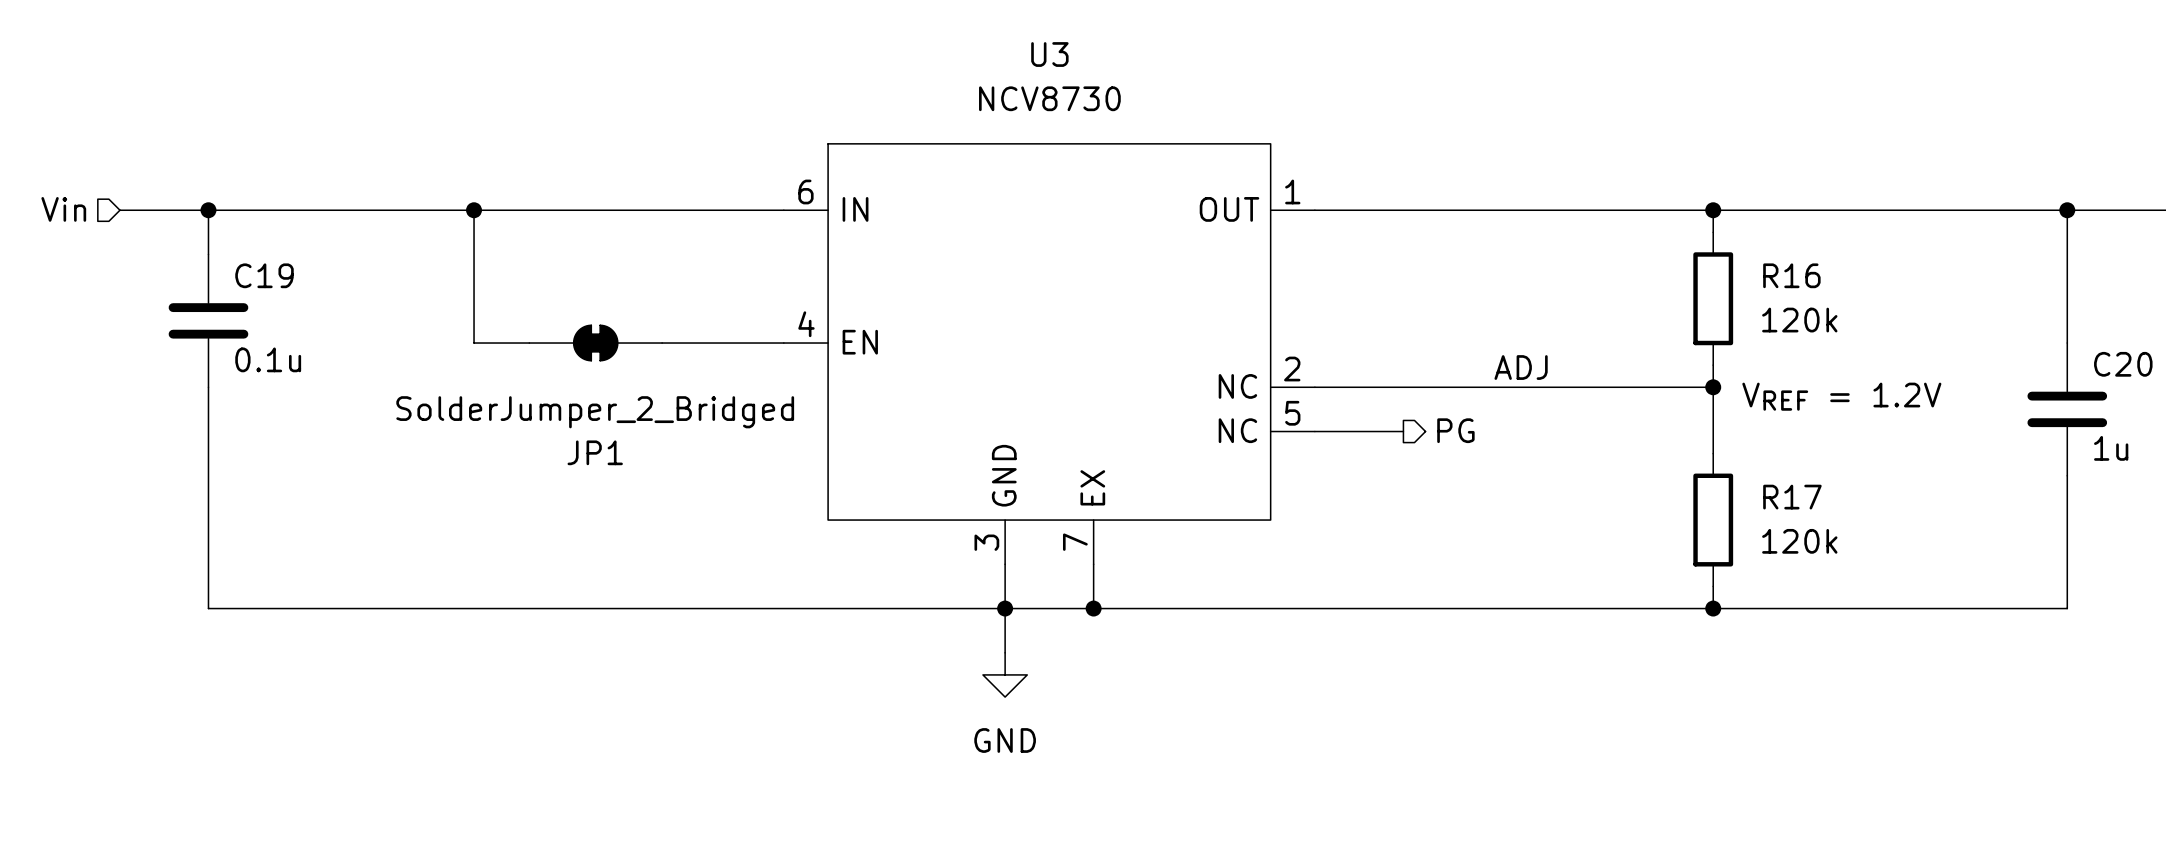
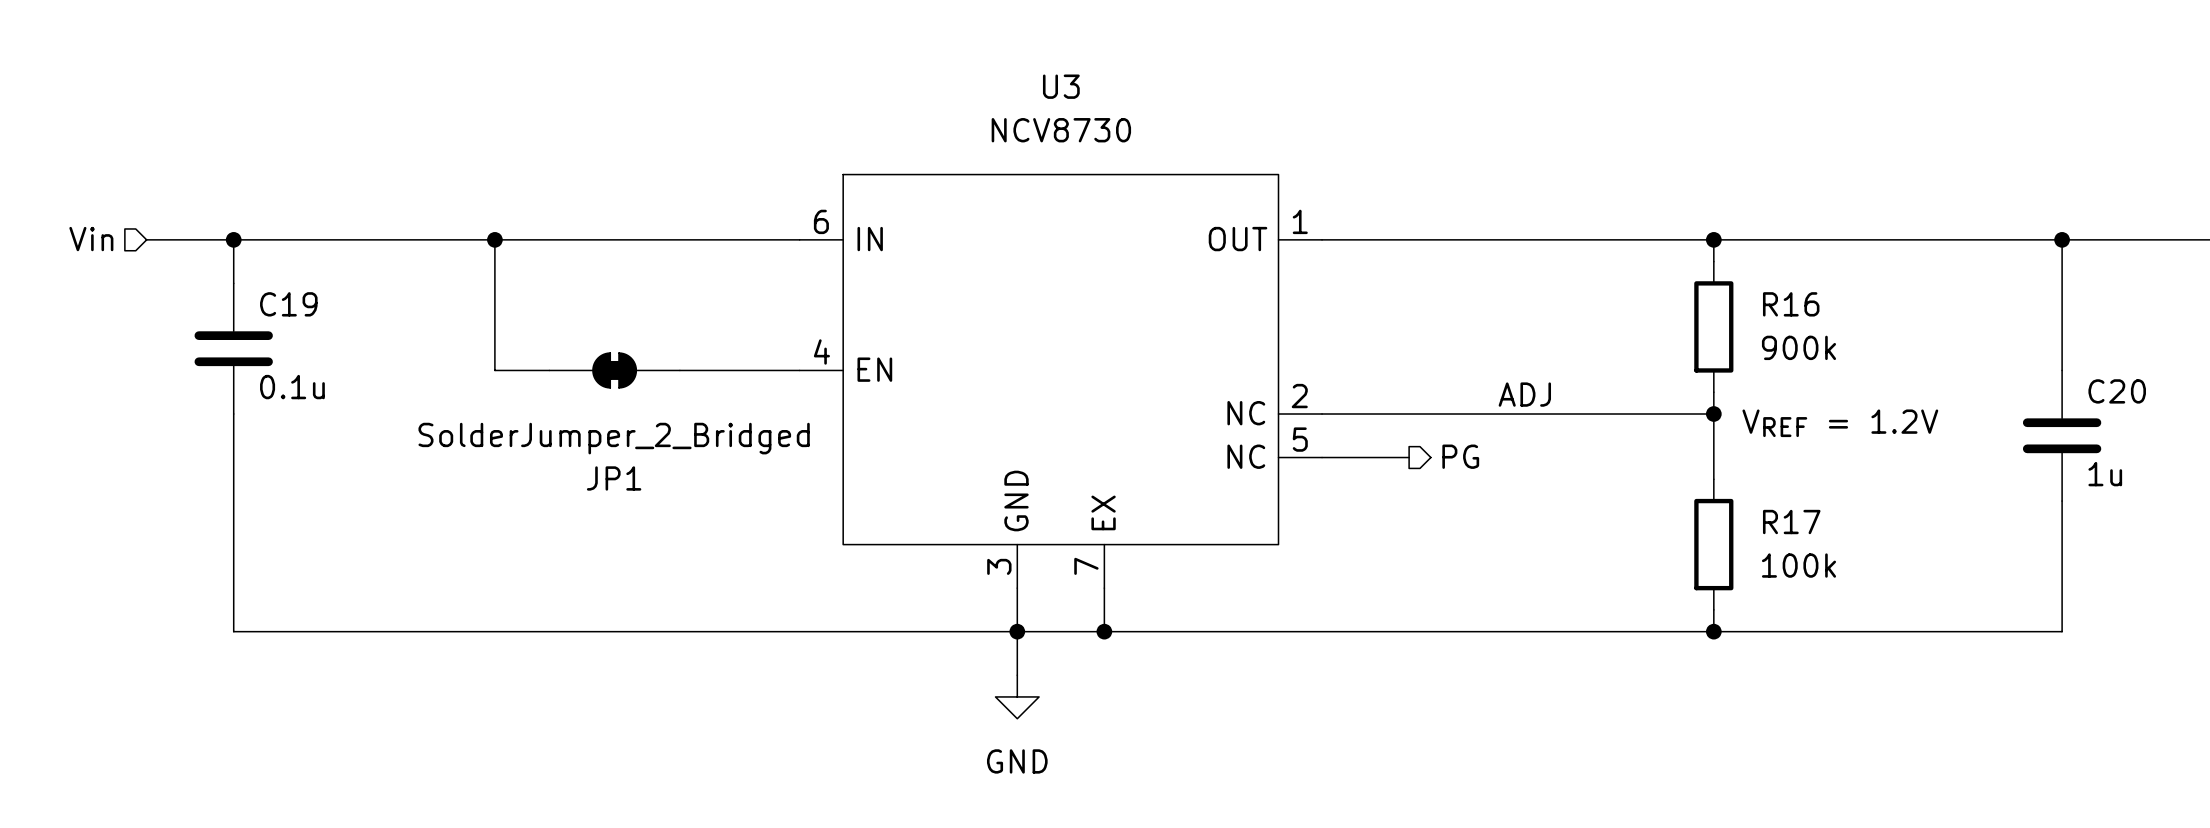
R16 value: 120k (1799, 320) -> 900k (1798, 347)
R17 value: 120k (1799, 541) -> 100k (1798, 565)

